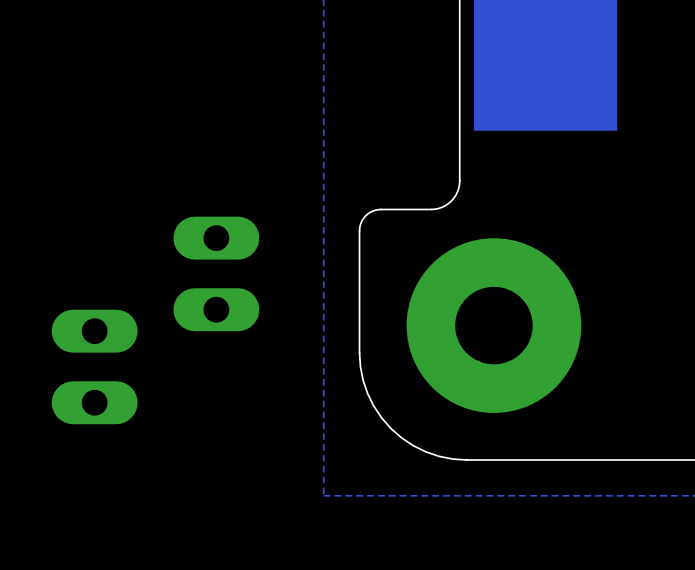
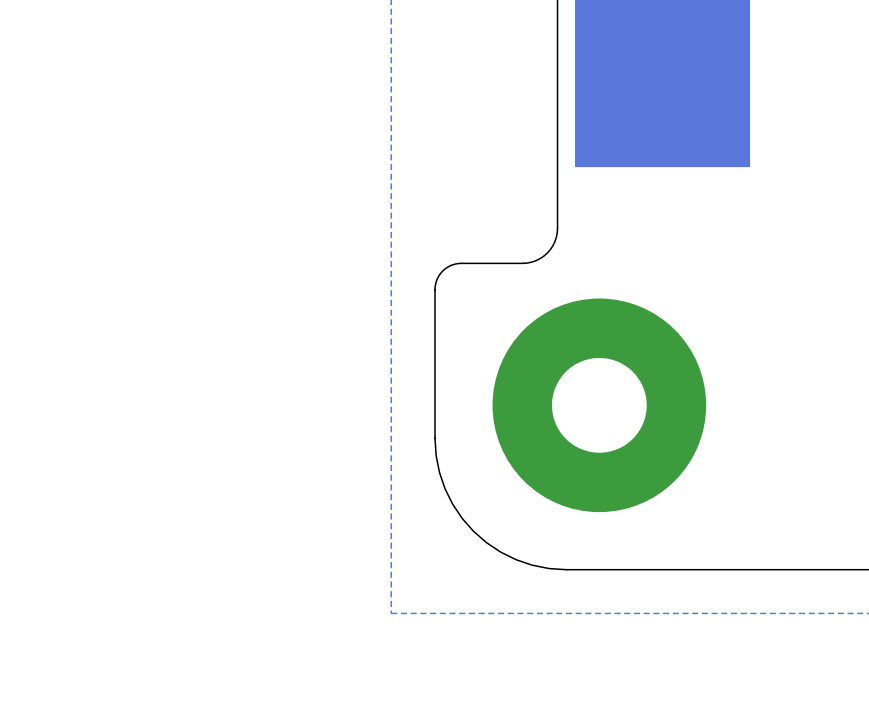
part: (216, 273) -> none
part: (94, 366) -> none

